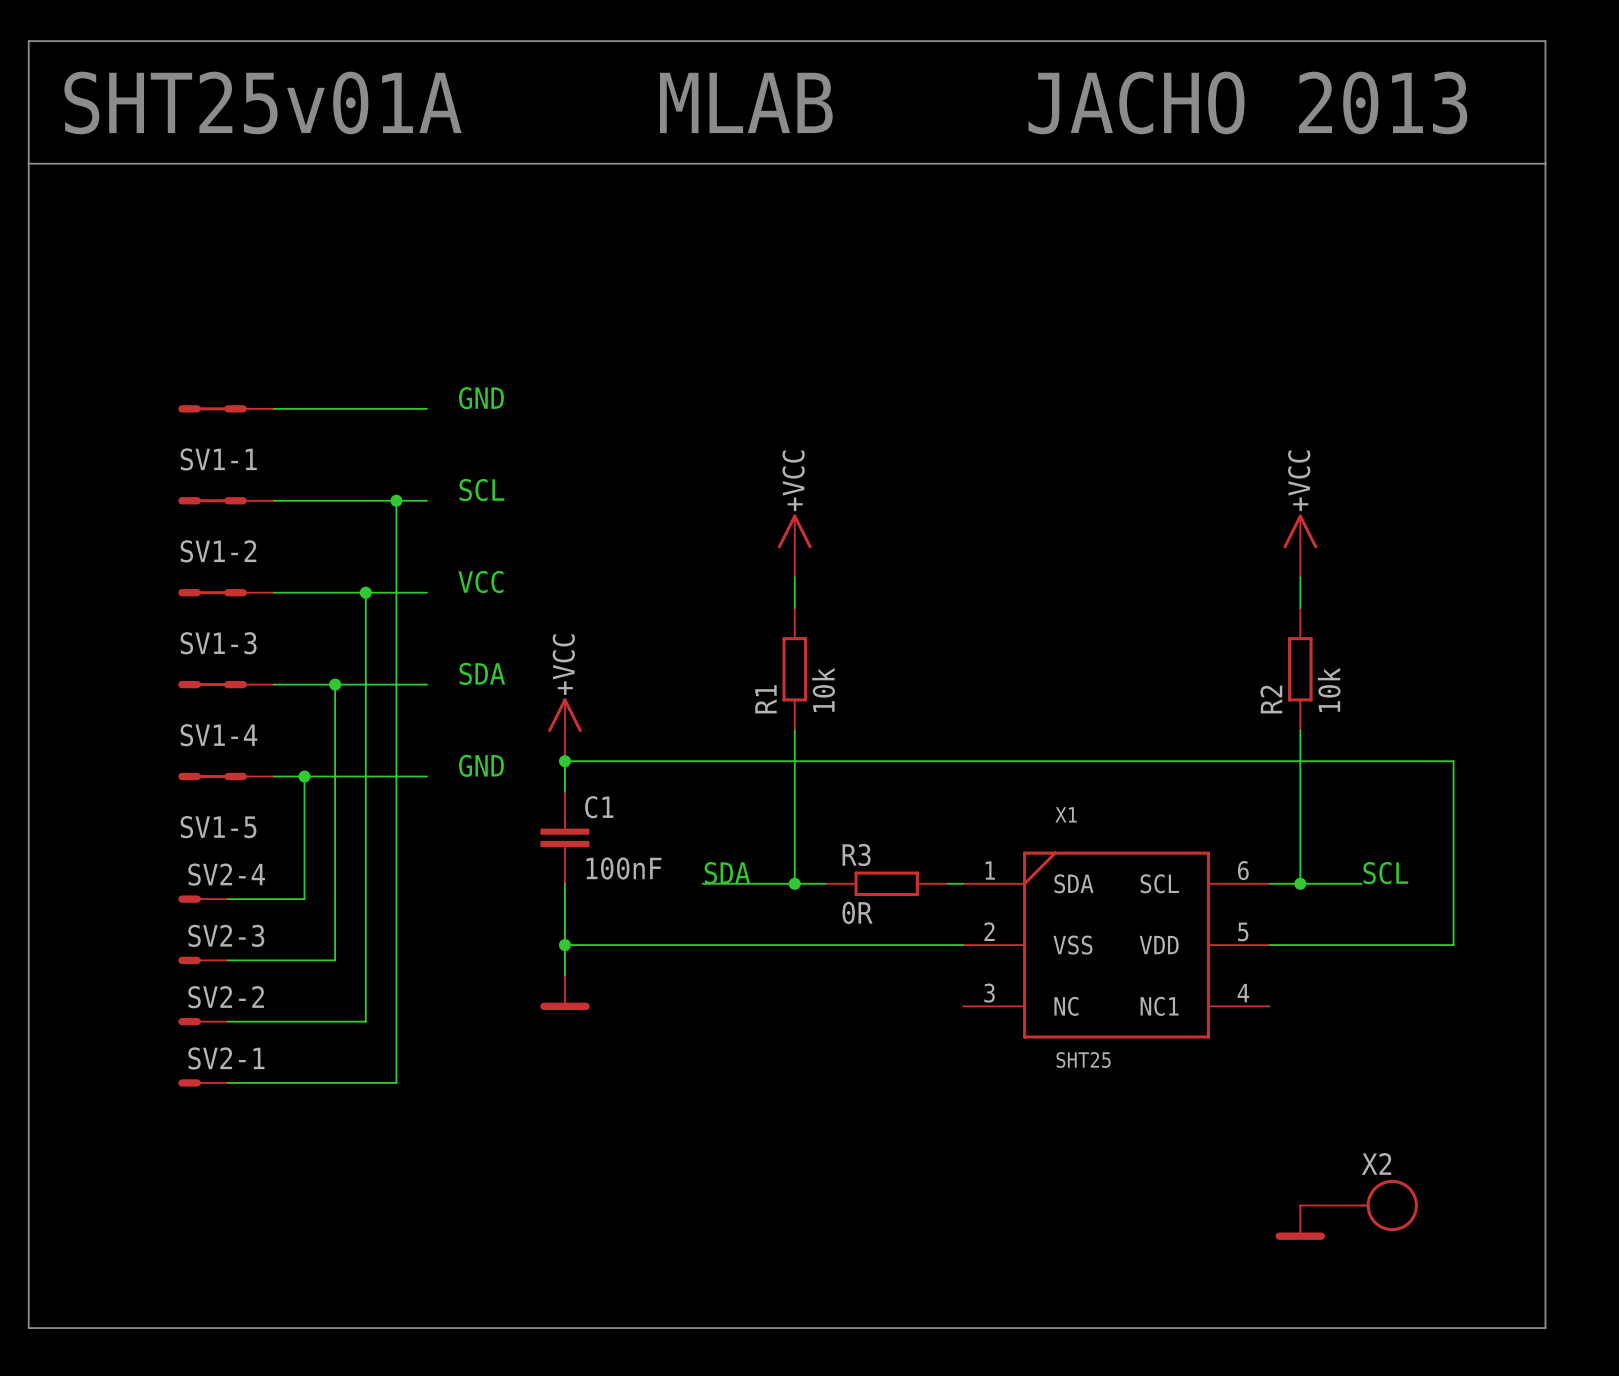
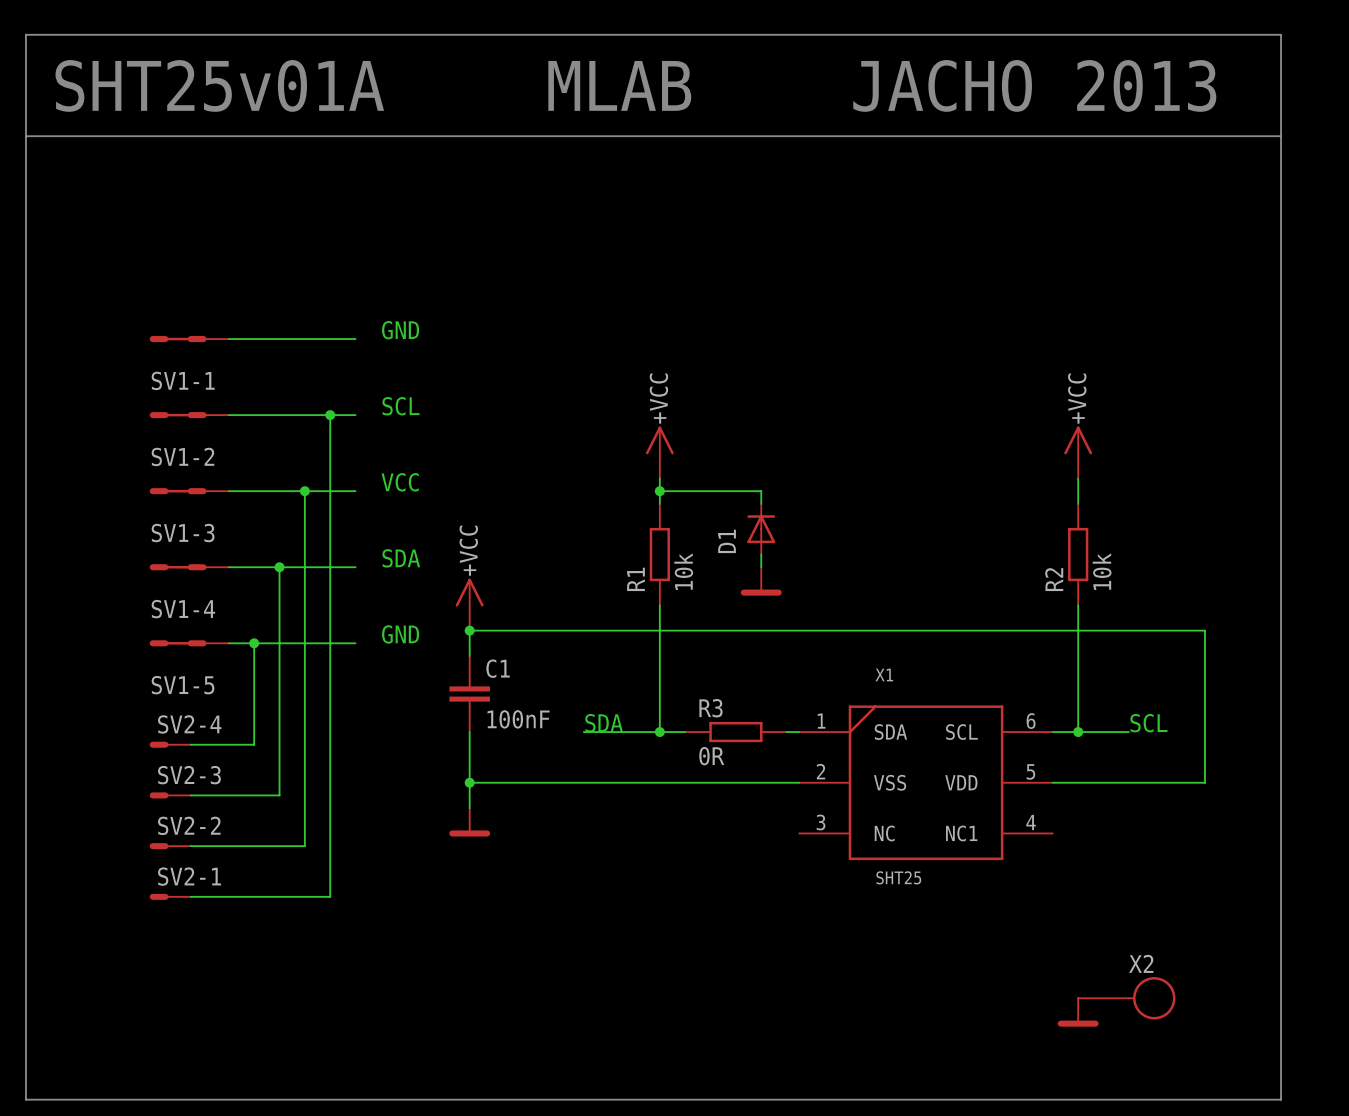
wire: none -> (659, 491) (761, 491) (761, 503)
junction: none -> (659, 491)
D1: none -> (761, 529)
wire: none -> (761, 554) (761, 567)
power symbol: none -> (761, 581)

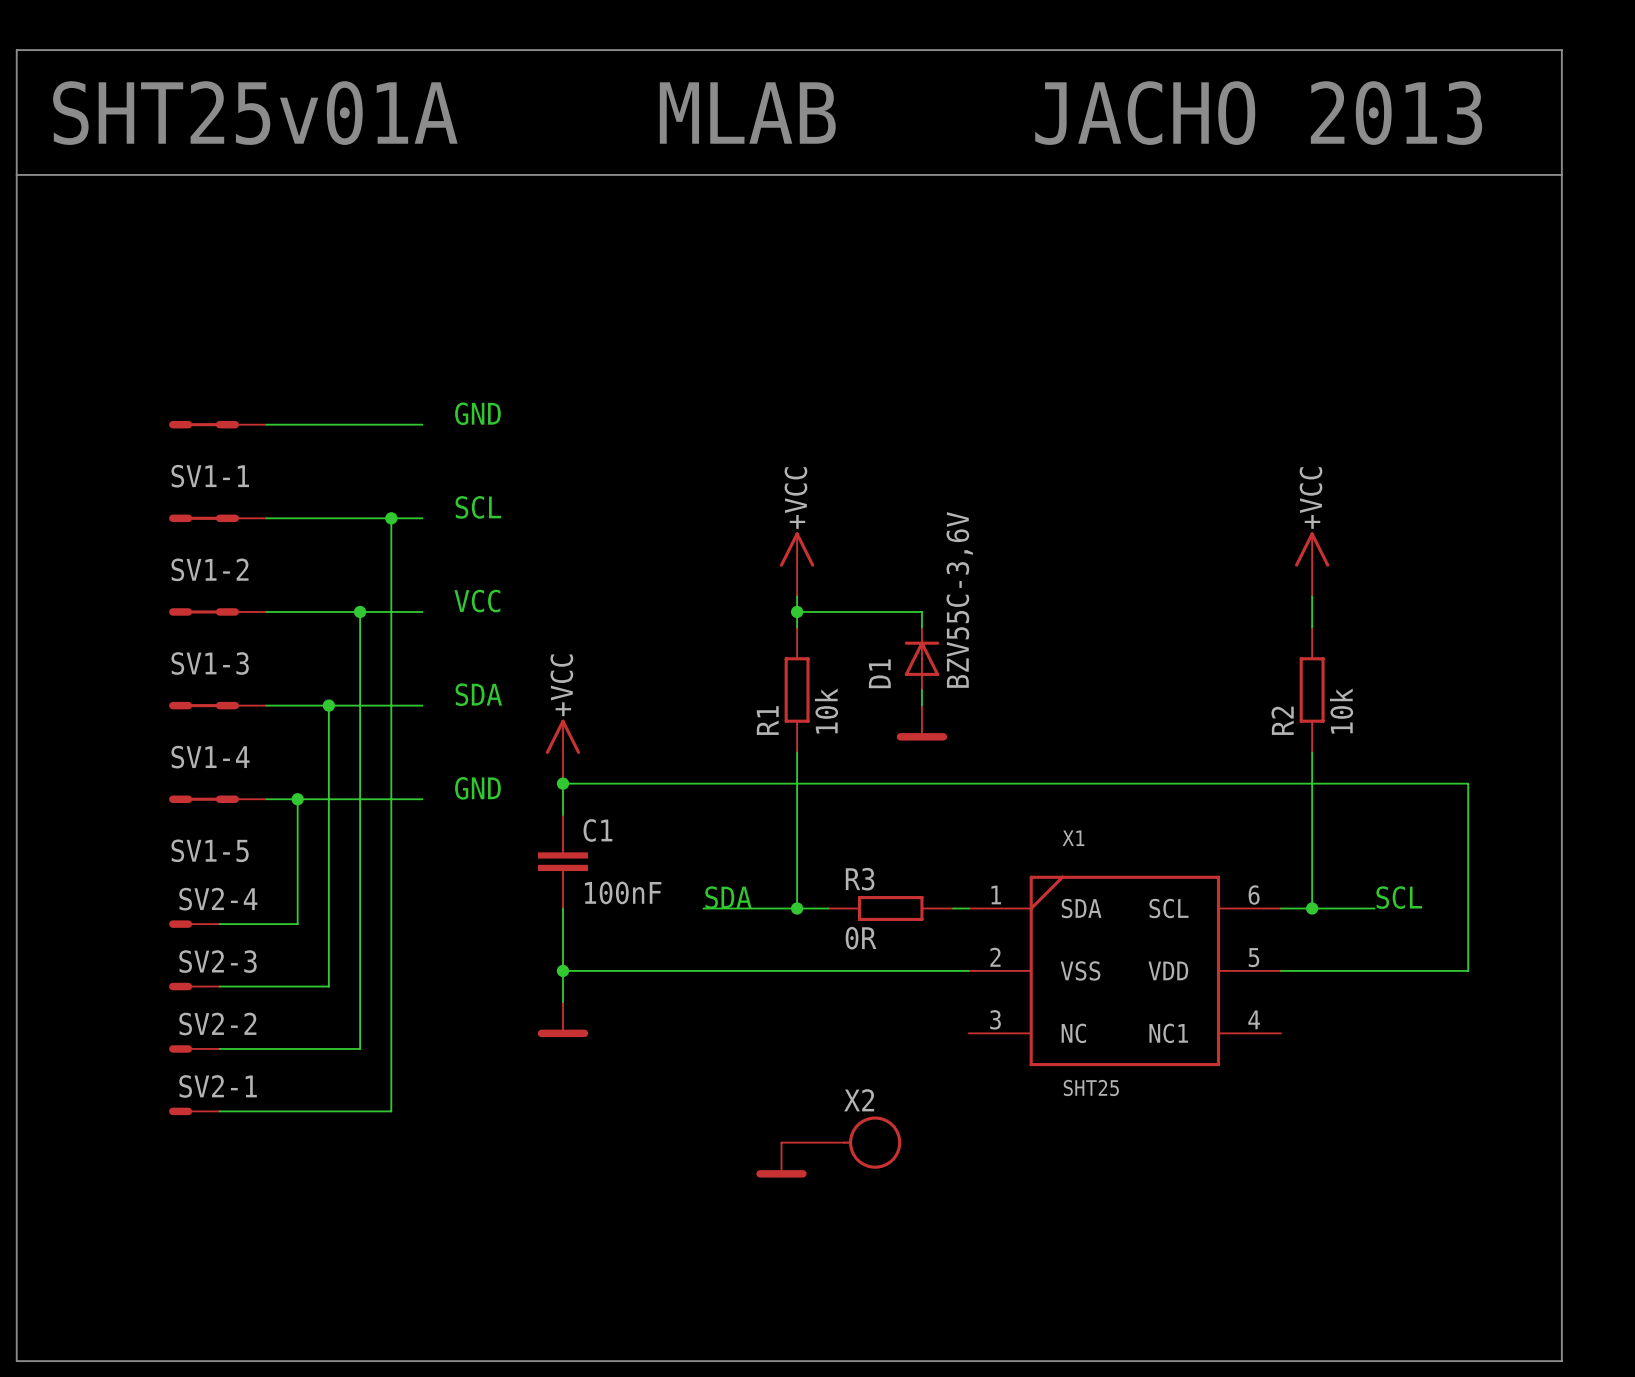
D1 value: none -> BZV55C-3,6V (959, 599)
power symbol: none -> (781, 1160)
X2 position: (1126, 998) -> (841, 1142)
power symbol: (1078, 1012) -> none

